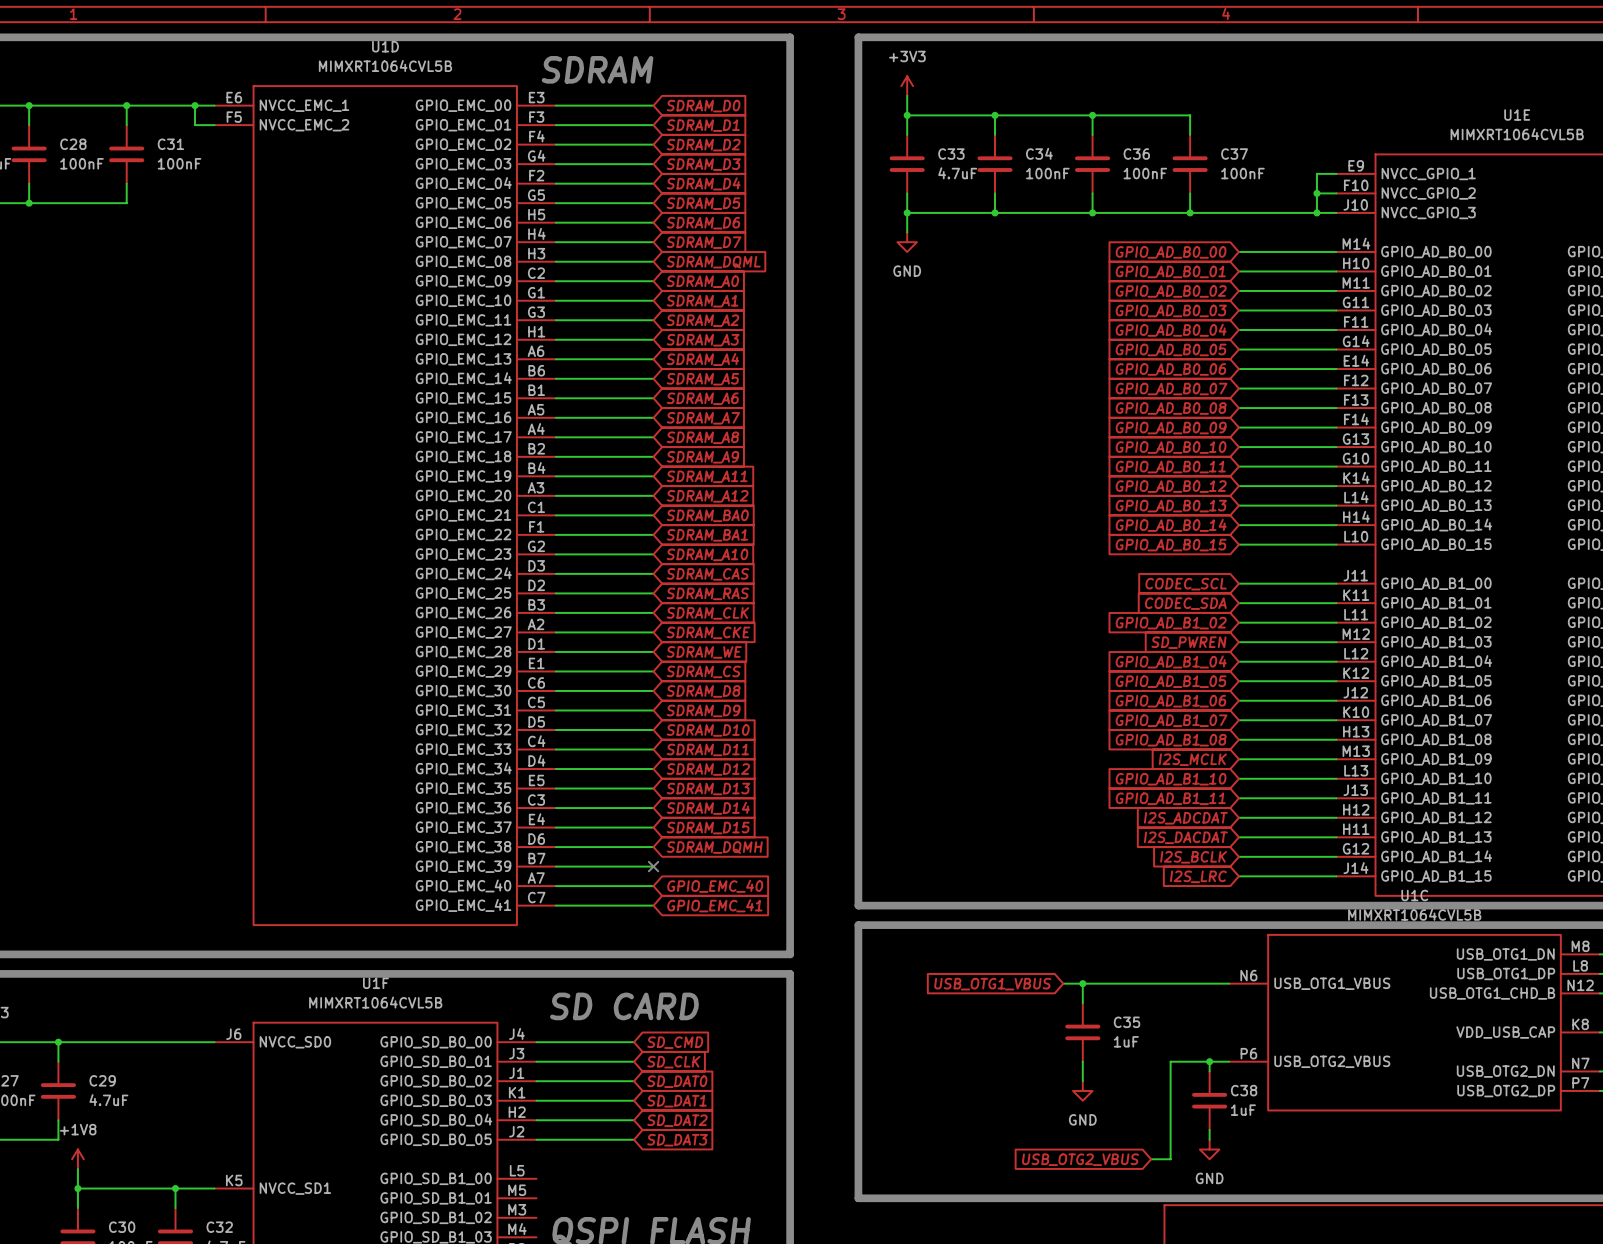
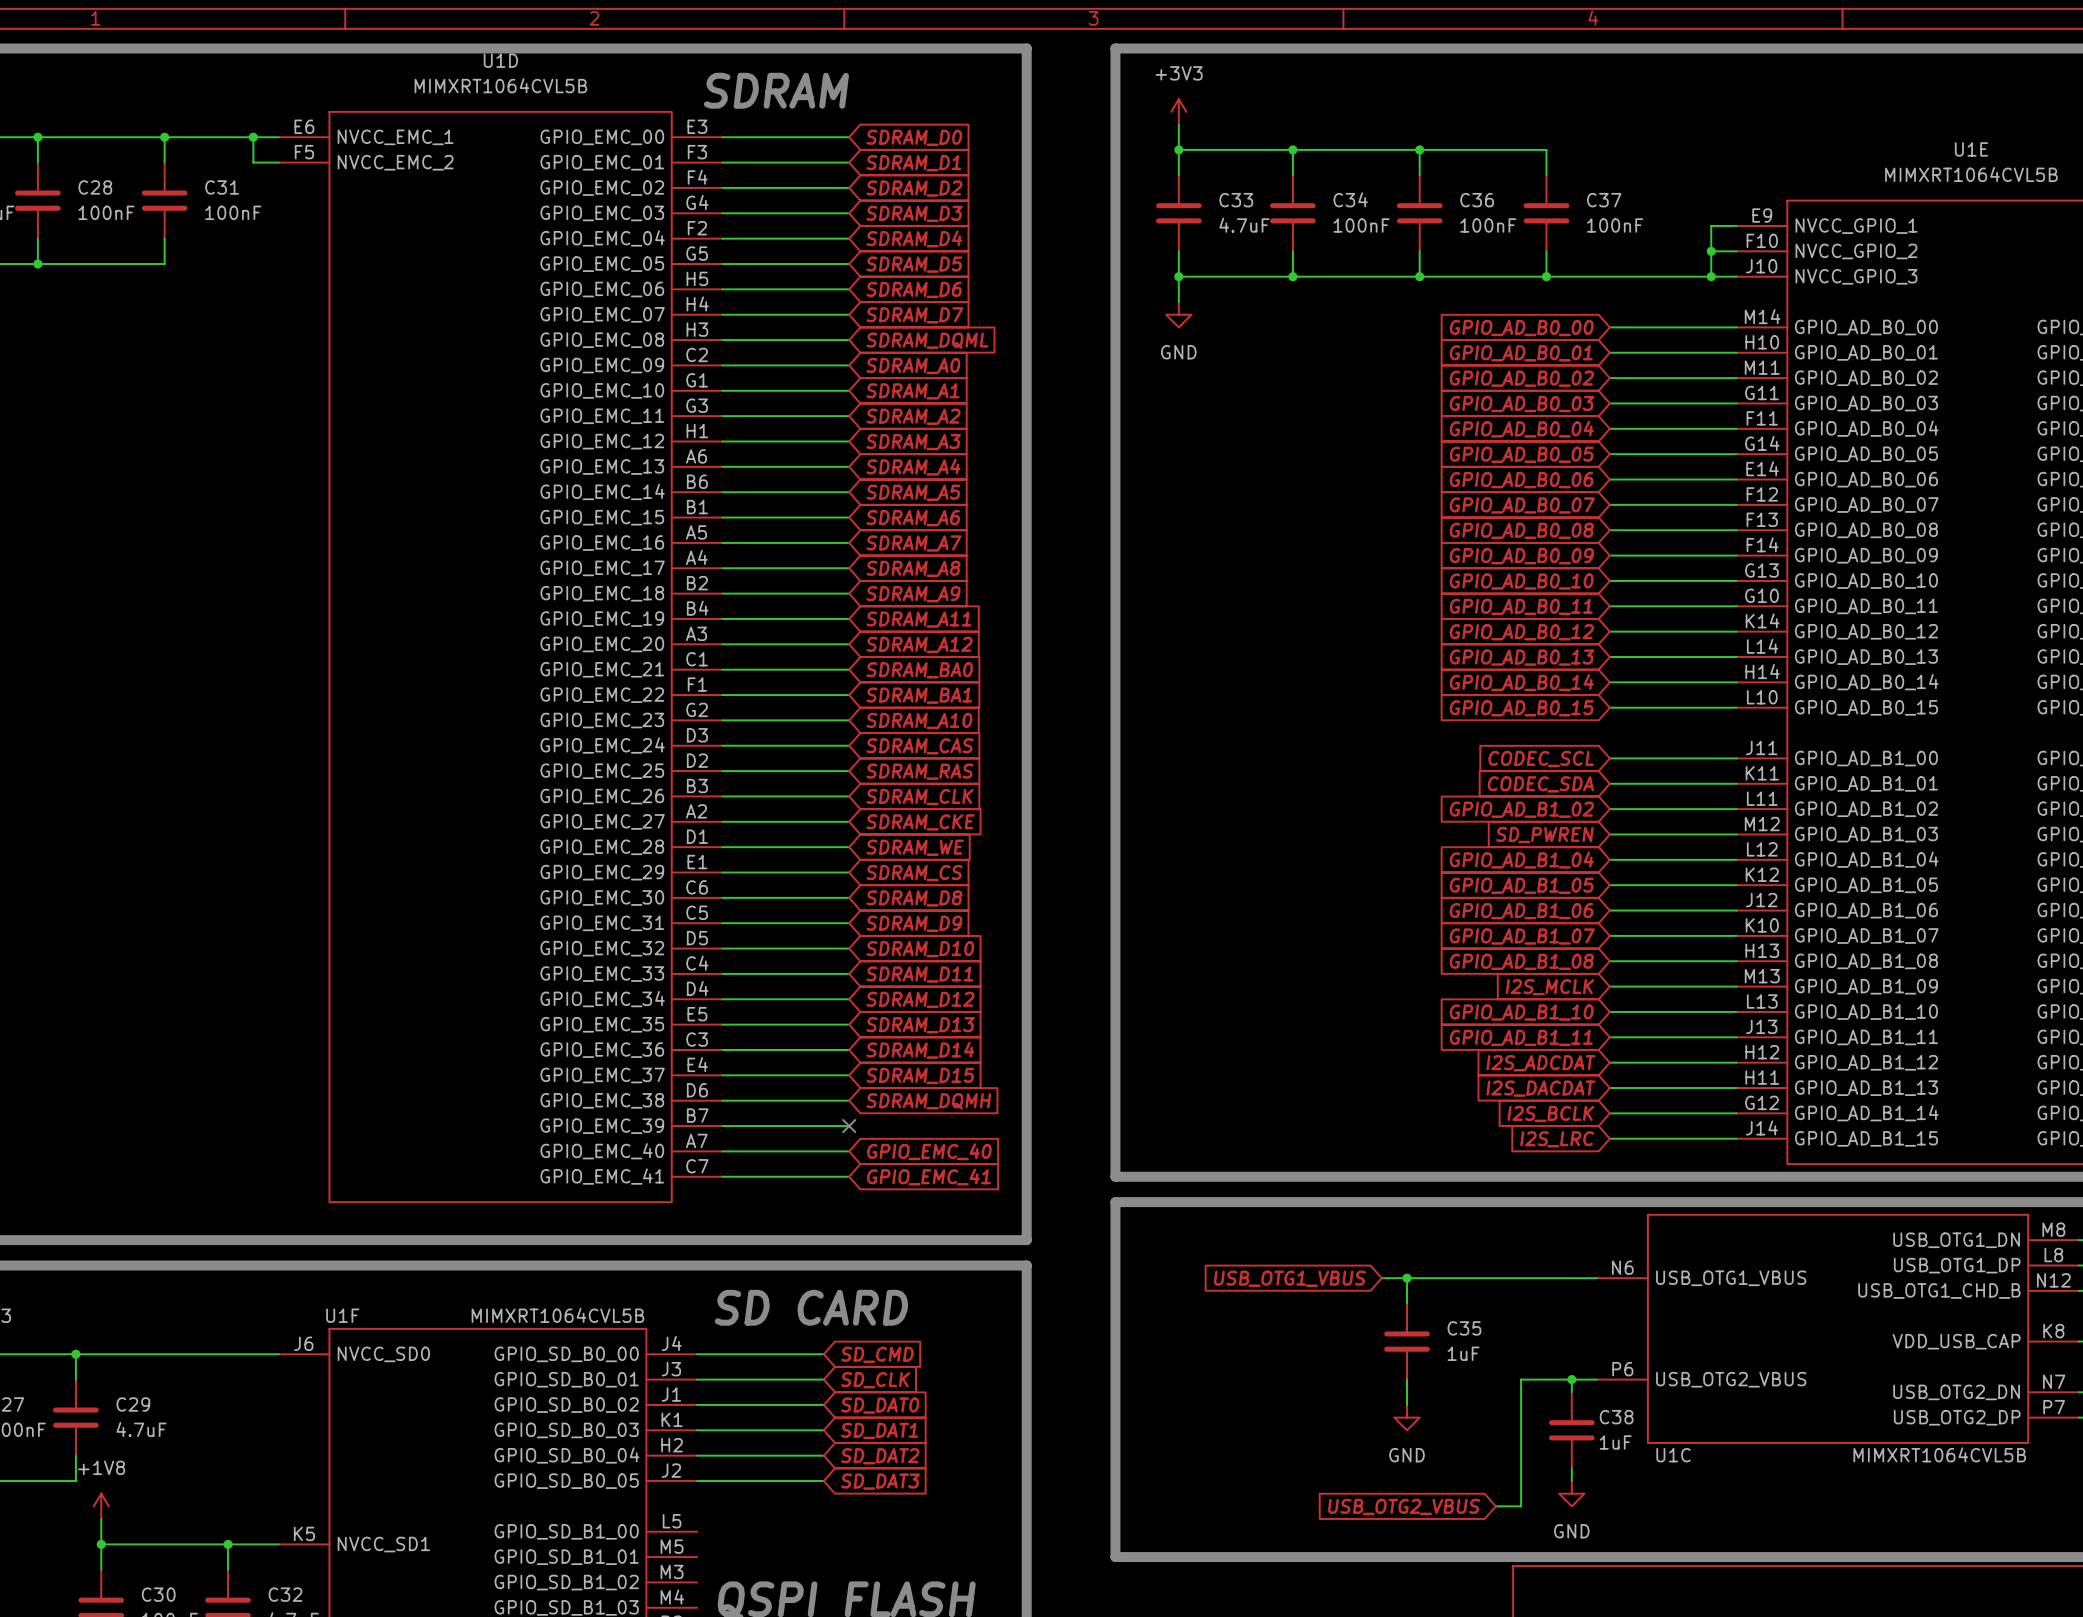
U1C name position: U1C (1414, 895) -> U1C (1673, 1455)
U1C value position: MIMXRT1064CVL5B (1414, 914) -> MIMXRT1064CVL5B (1939, 1454)
U1F name position: U1F (375, 983) -> U1F (342, 1315)
U1F value position: MIMXRT1064CVL5B (375, 1002) -> MIMXRT1064CVL5B (557, 1315)

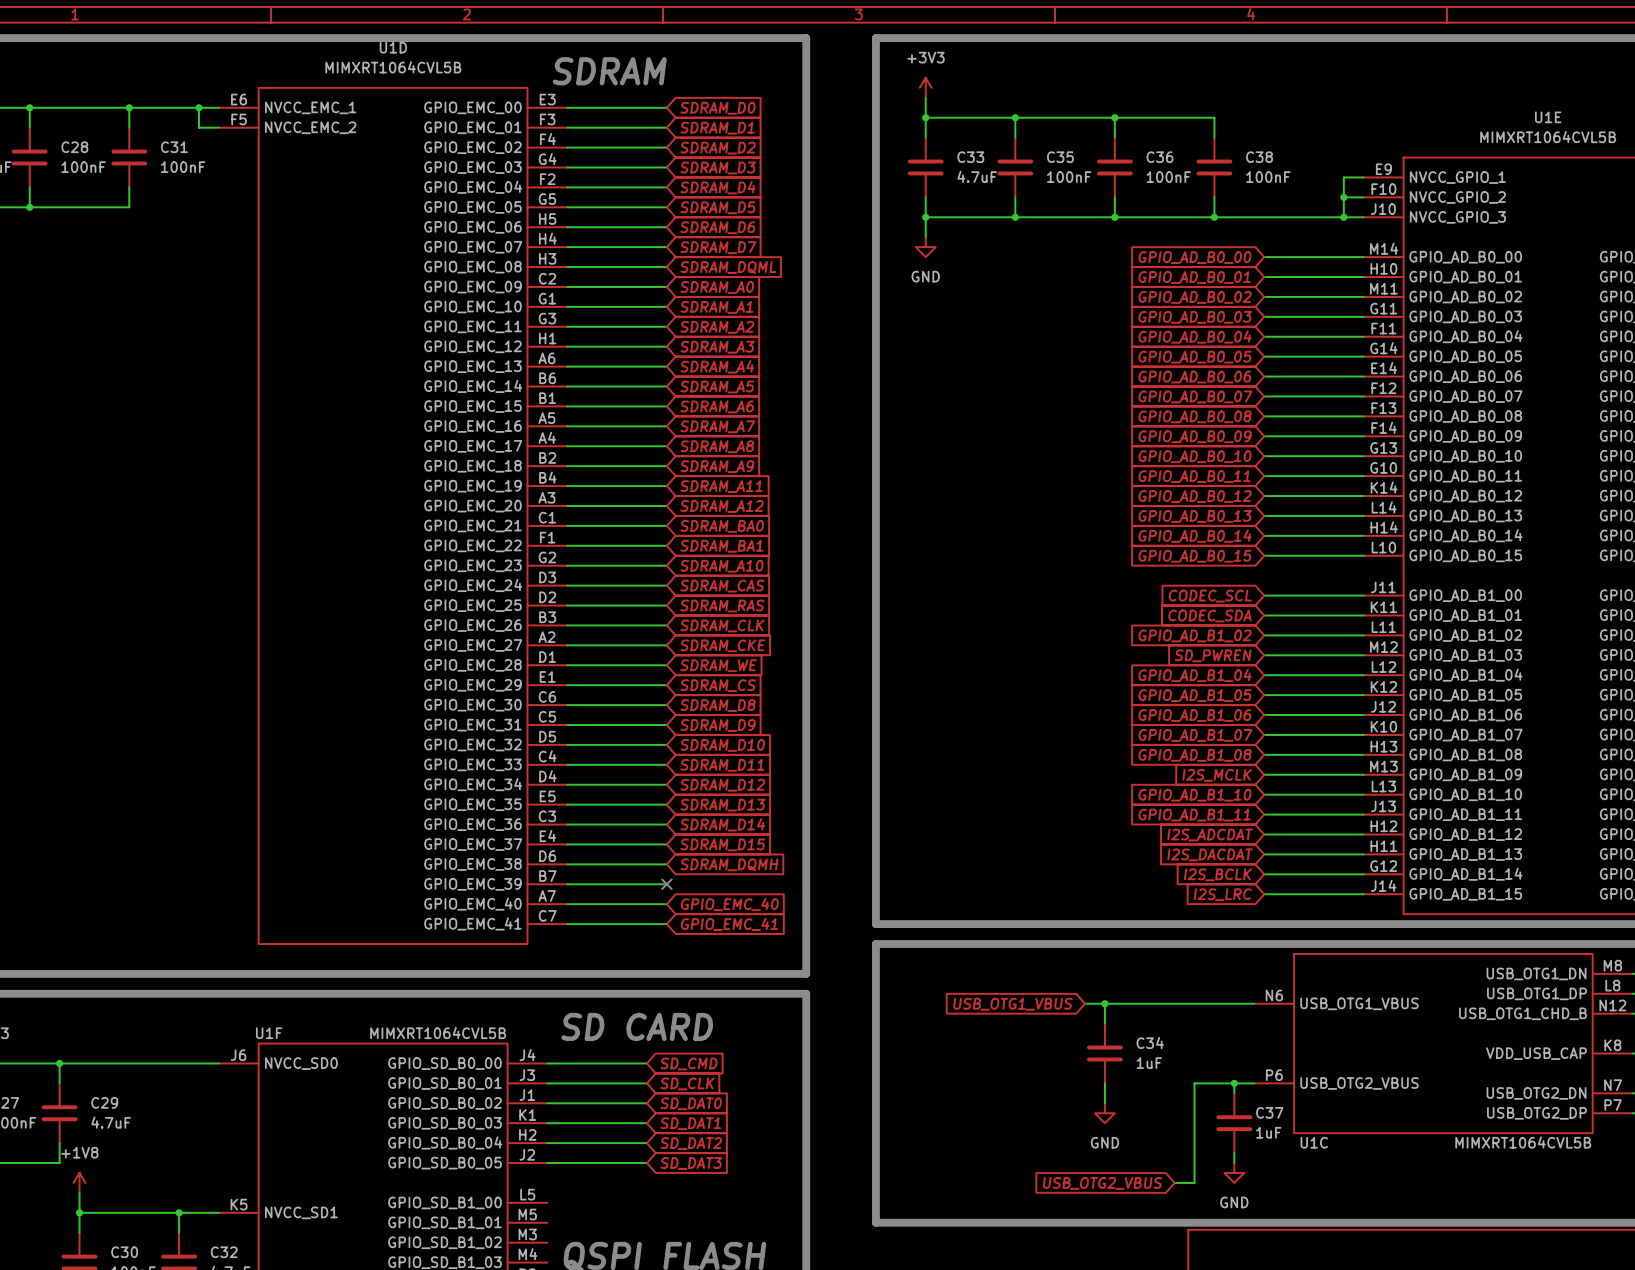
C34 name: C34 (1350, 199) -> C35 (1060, 157)
C37 name: C37 (1604, 200) -> C38 (1259, 157)
C35 name: C35 (1464, 1328) -> C34 (1150, 1042)
C38 name: C38 (1616, 1417) -> C37 (1269, 1112)

